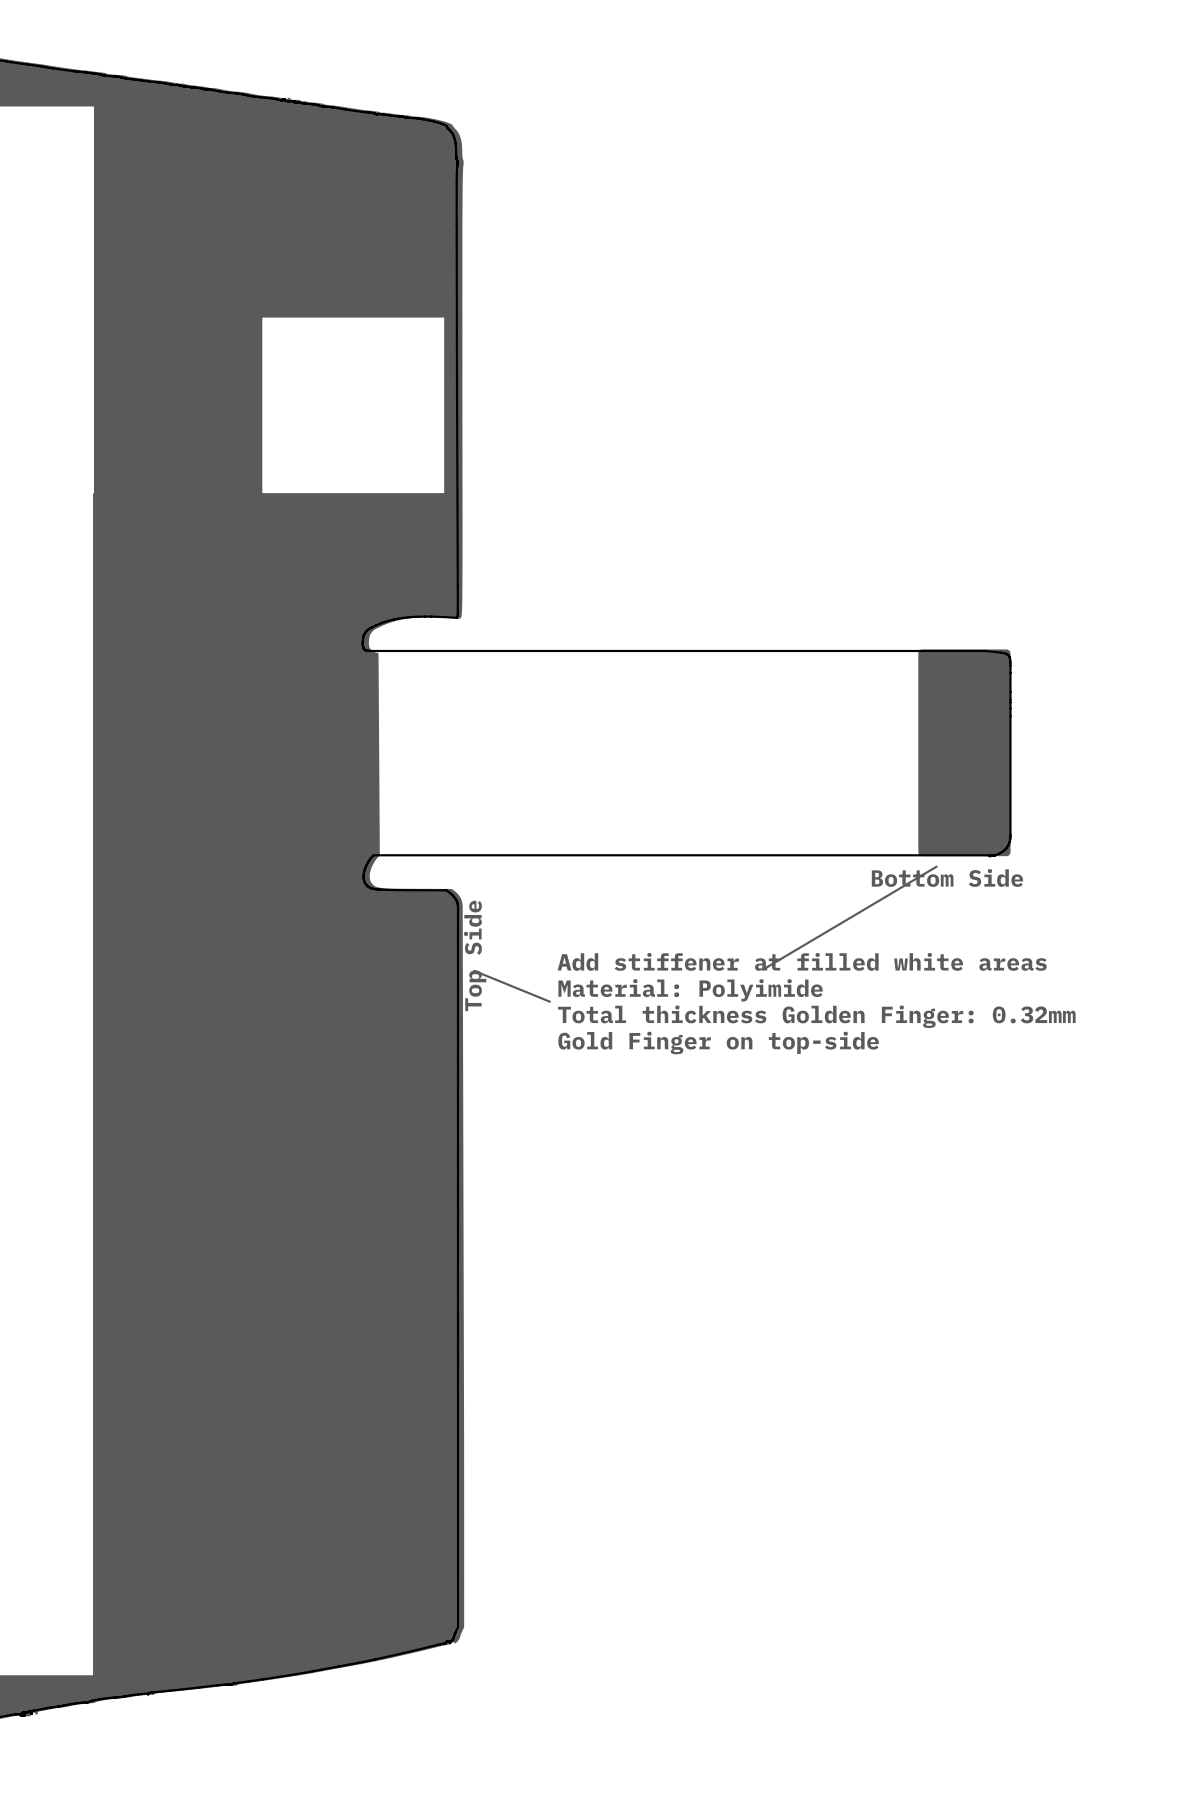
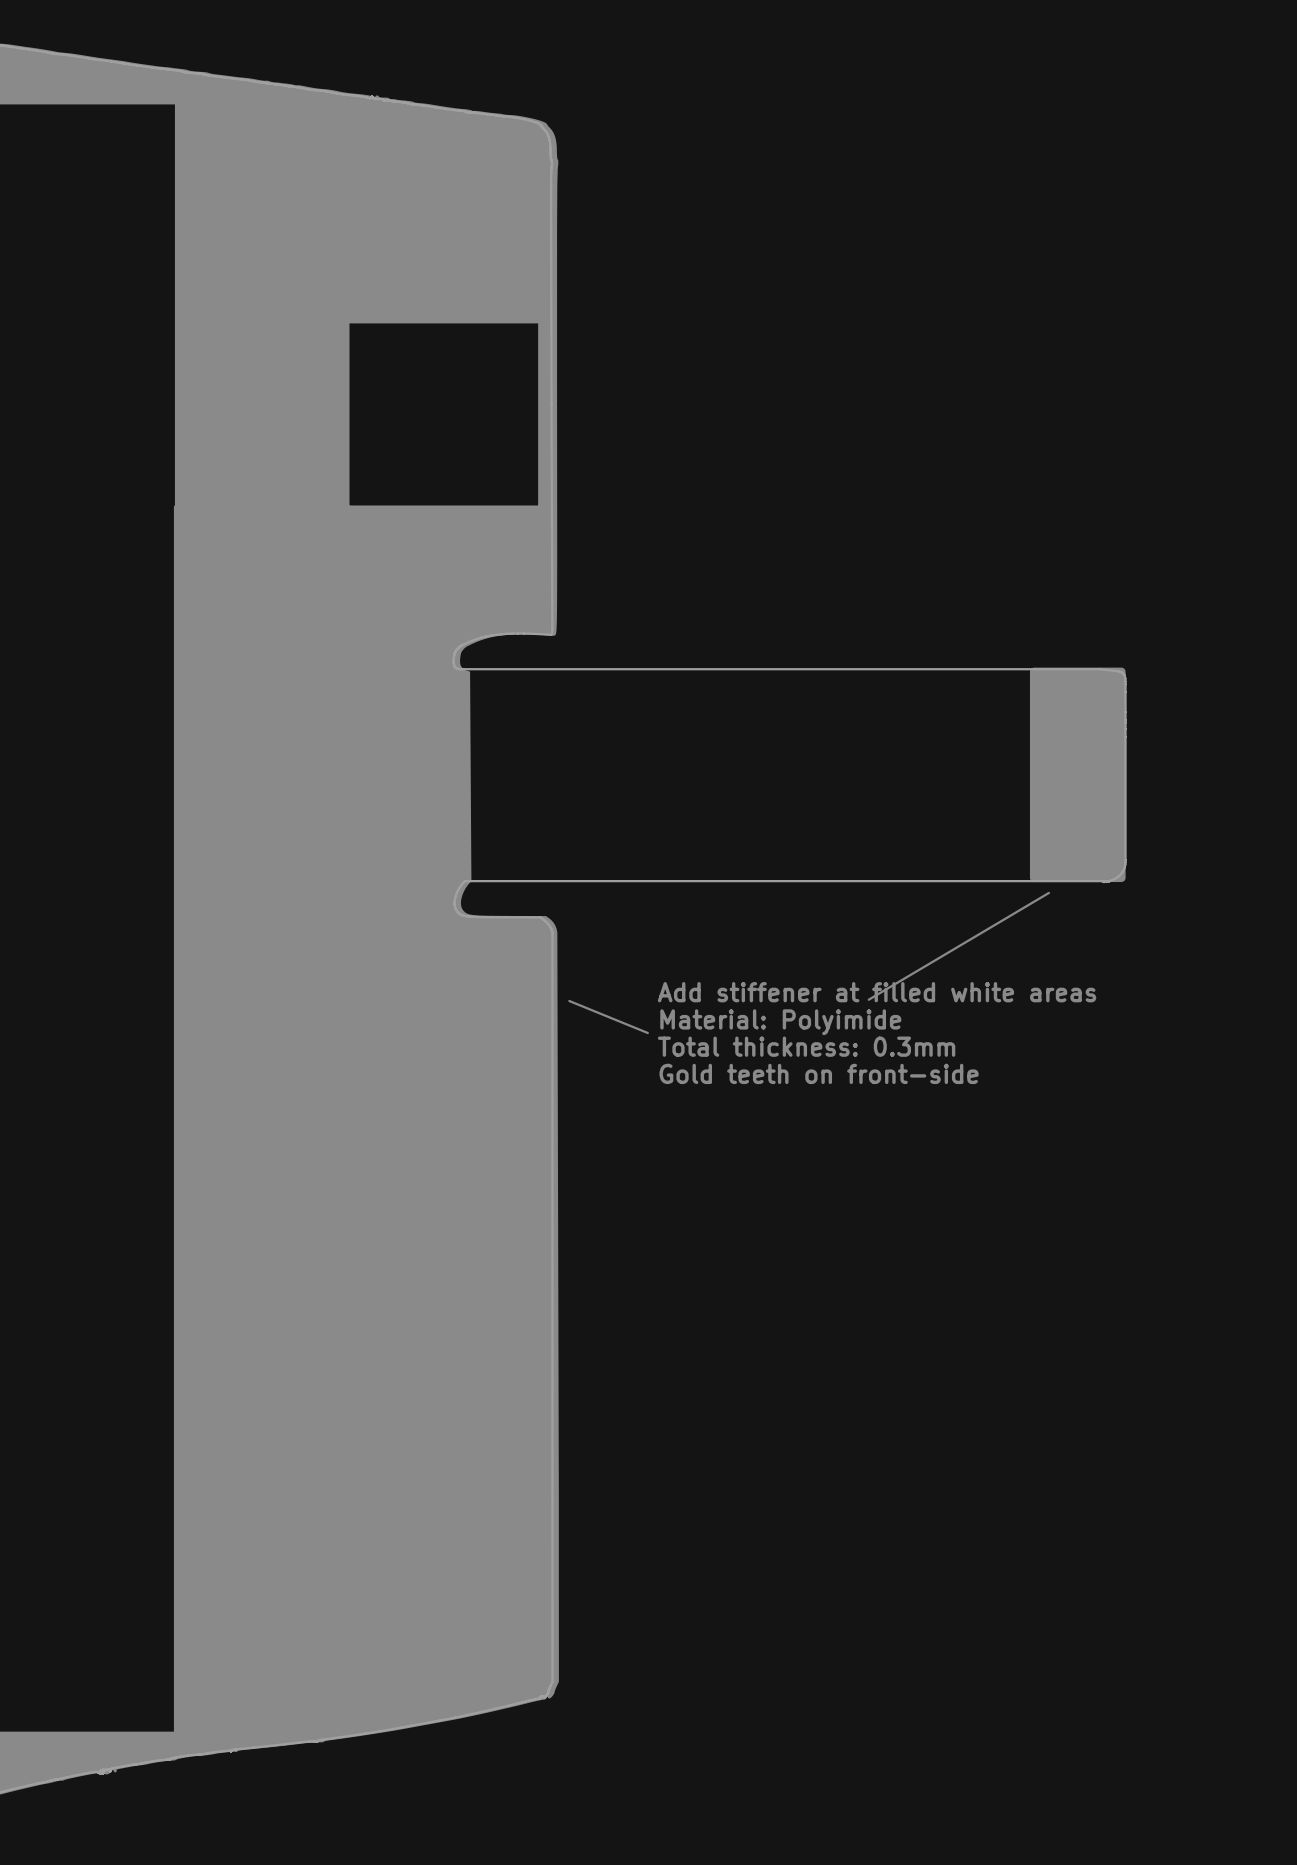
text: Bottom Side (947, 878) -> none
text: Top Side (475, 955) -> none
text: Total thickness Golden Finger: 0.32mm (816, 1016) -> Total thickness: 0.3mm (806, 1046)
text: Gold Finger on top-side (718, 1043) -> Gold teeth on front-side (819, 1073)

